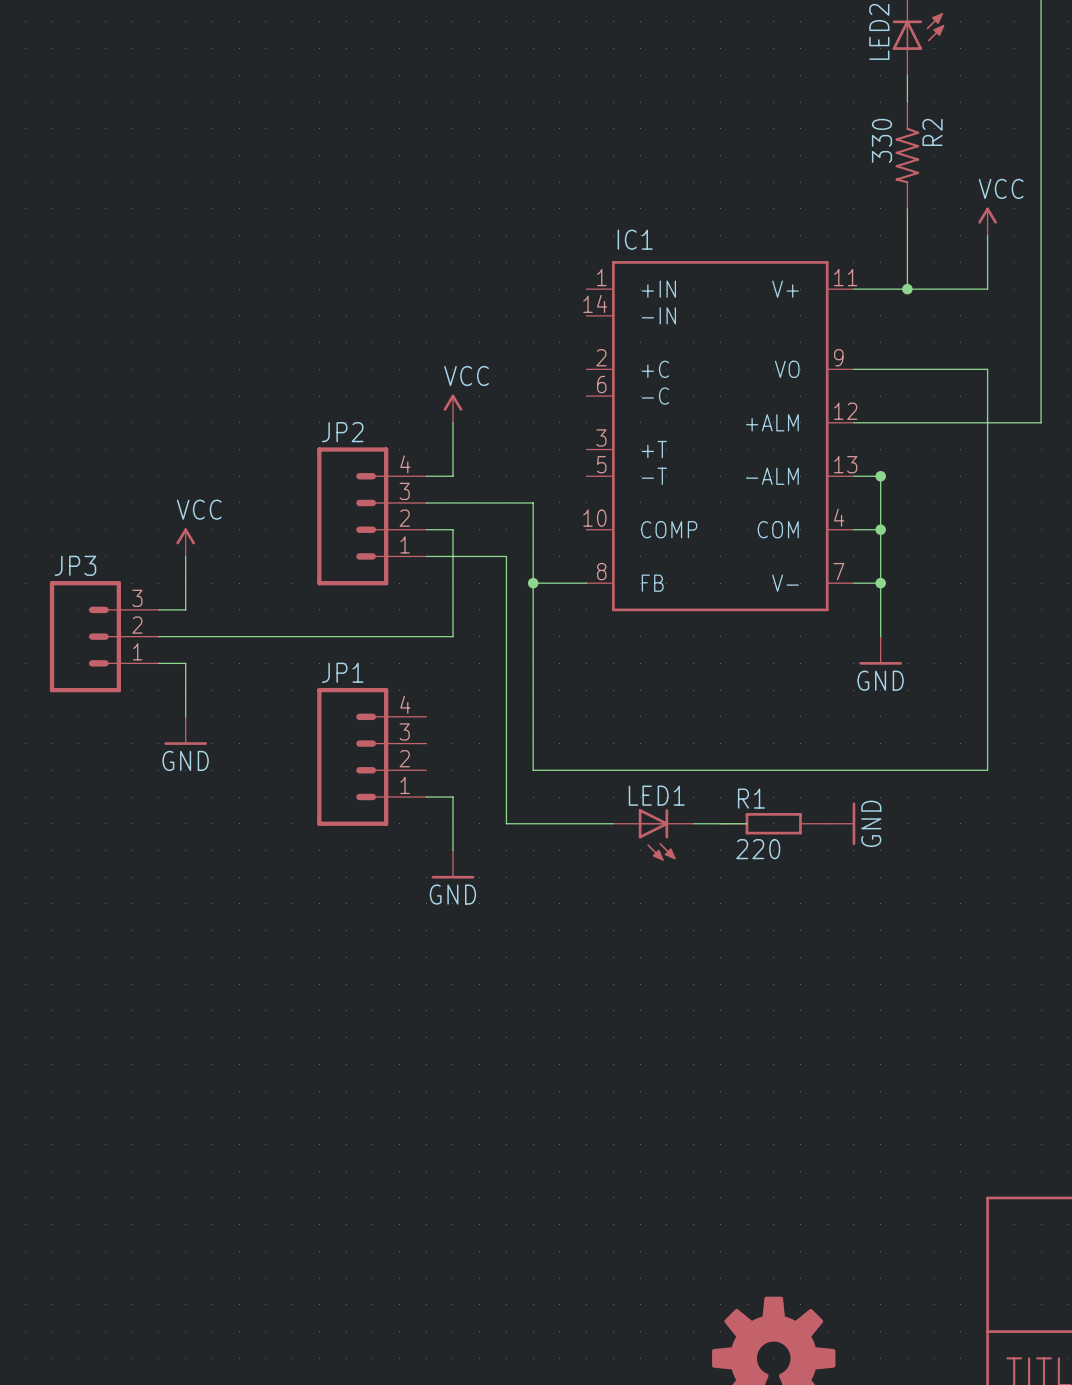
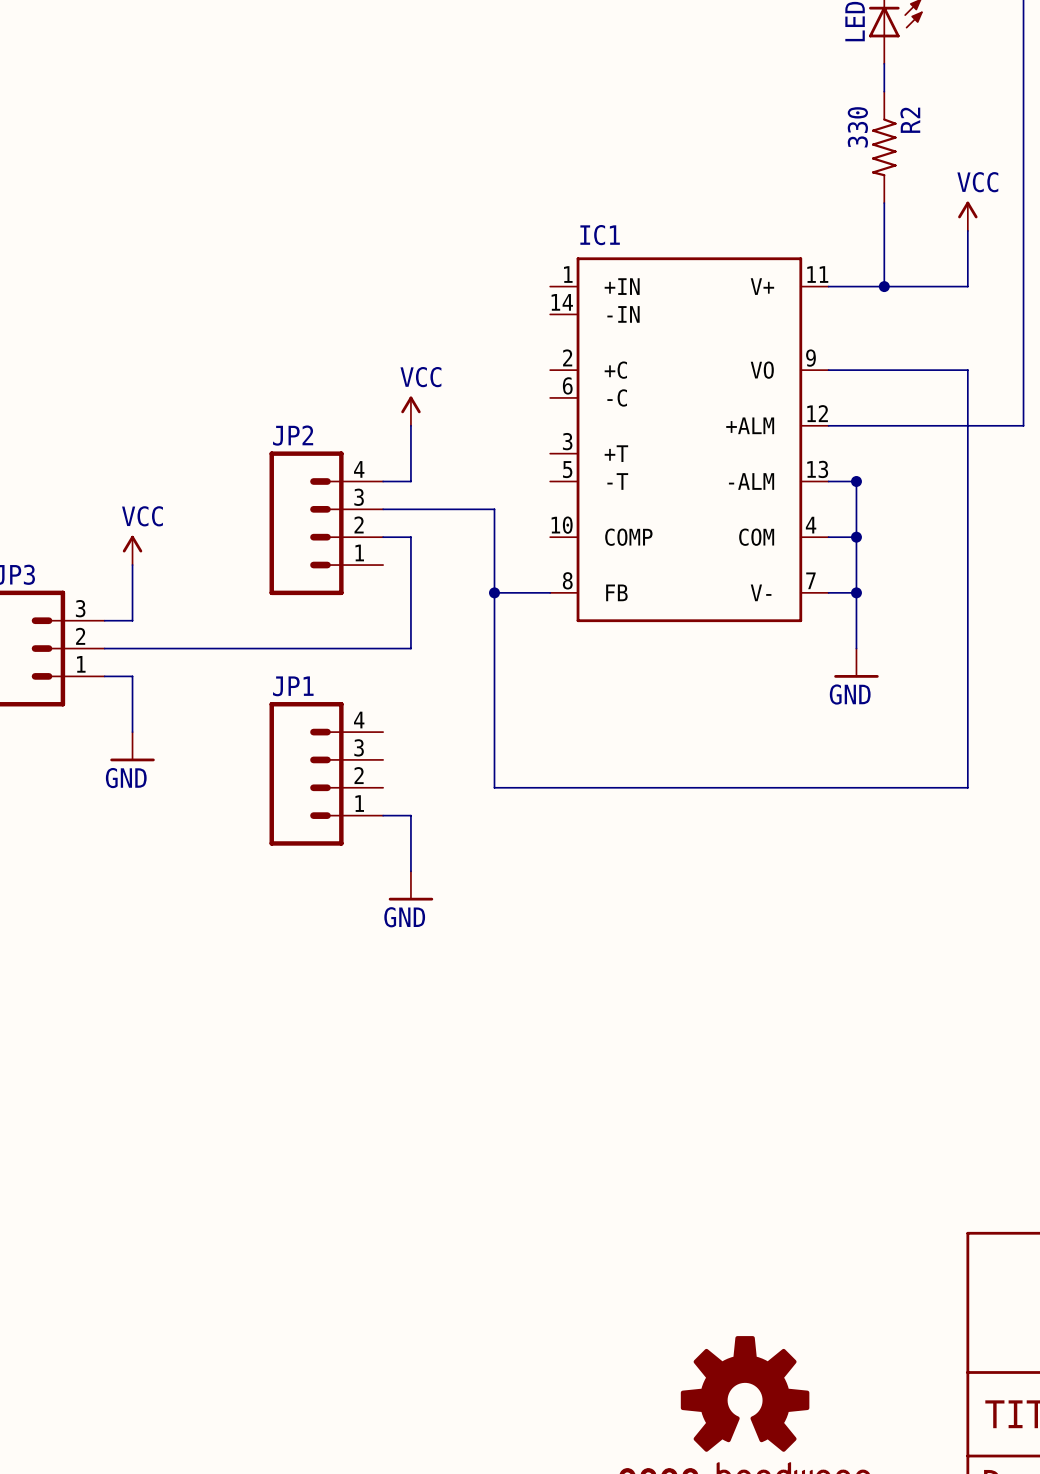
wire: (426, 556) (506, 556) (506, 823) (613, 823) -> none
wire: (693, 823) (747, 823) -> none
R1: 220 (773, 823) -> none
power symbol: GND (841, 823) -> none
LED1: (653, 834) -> none

